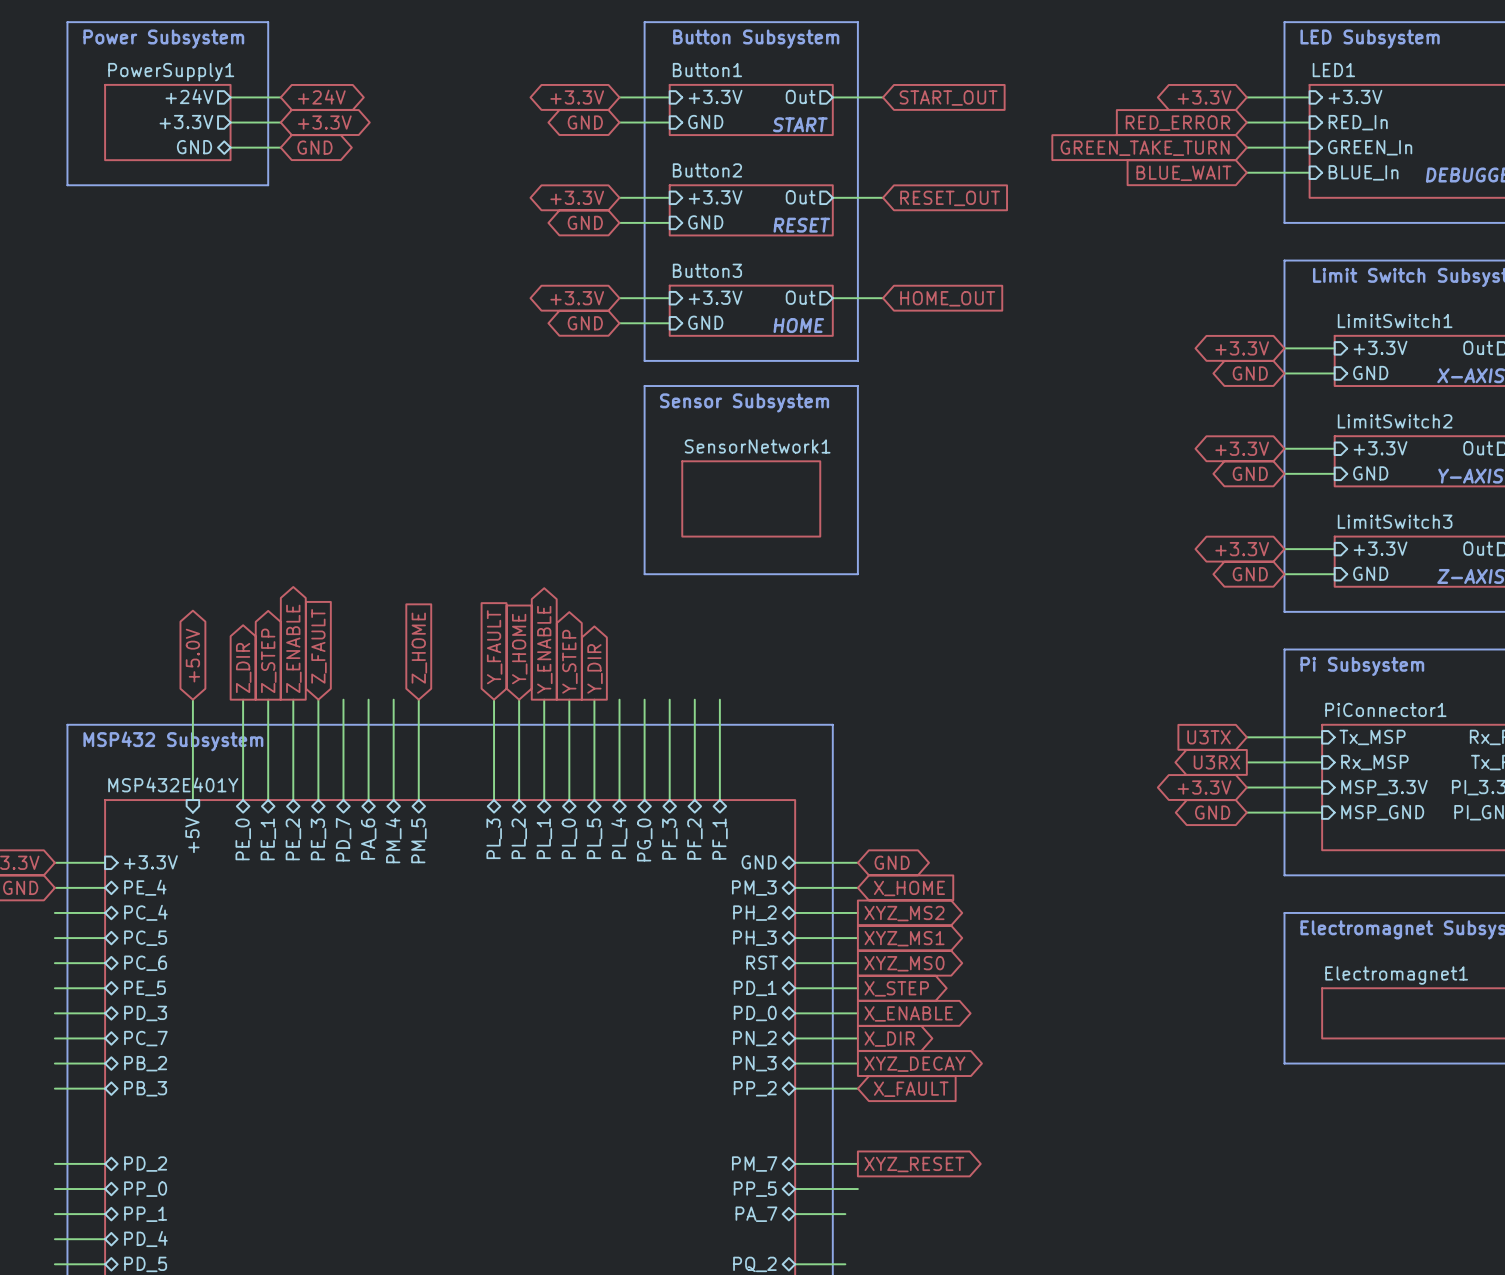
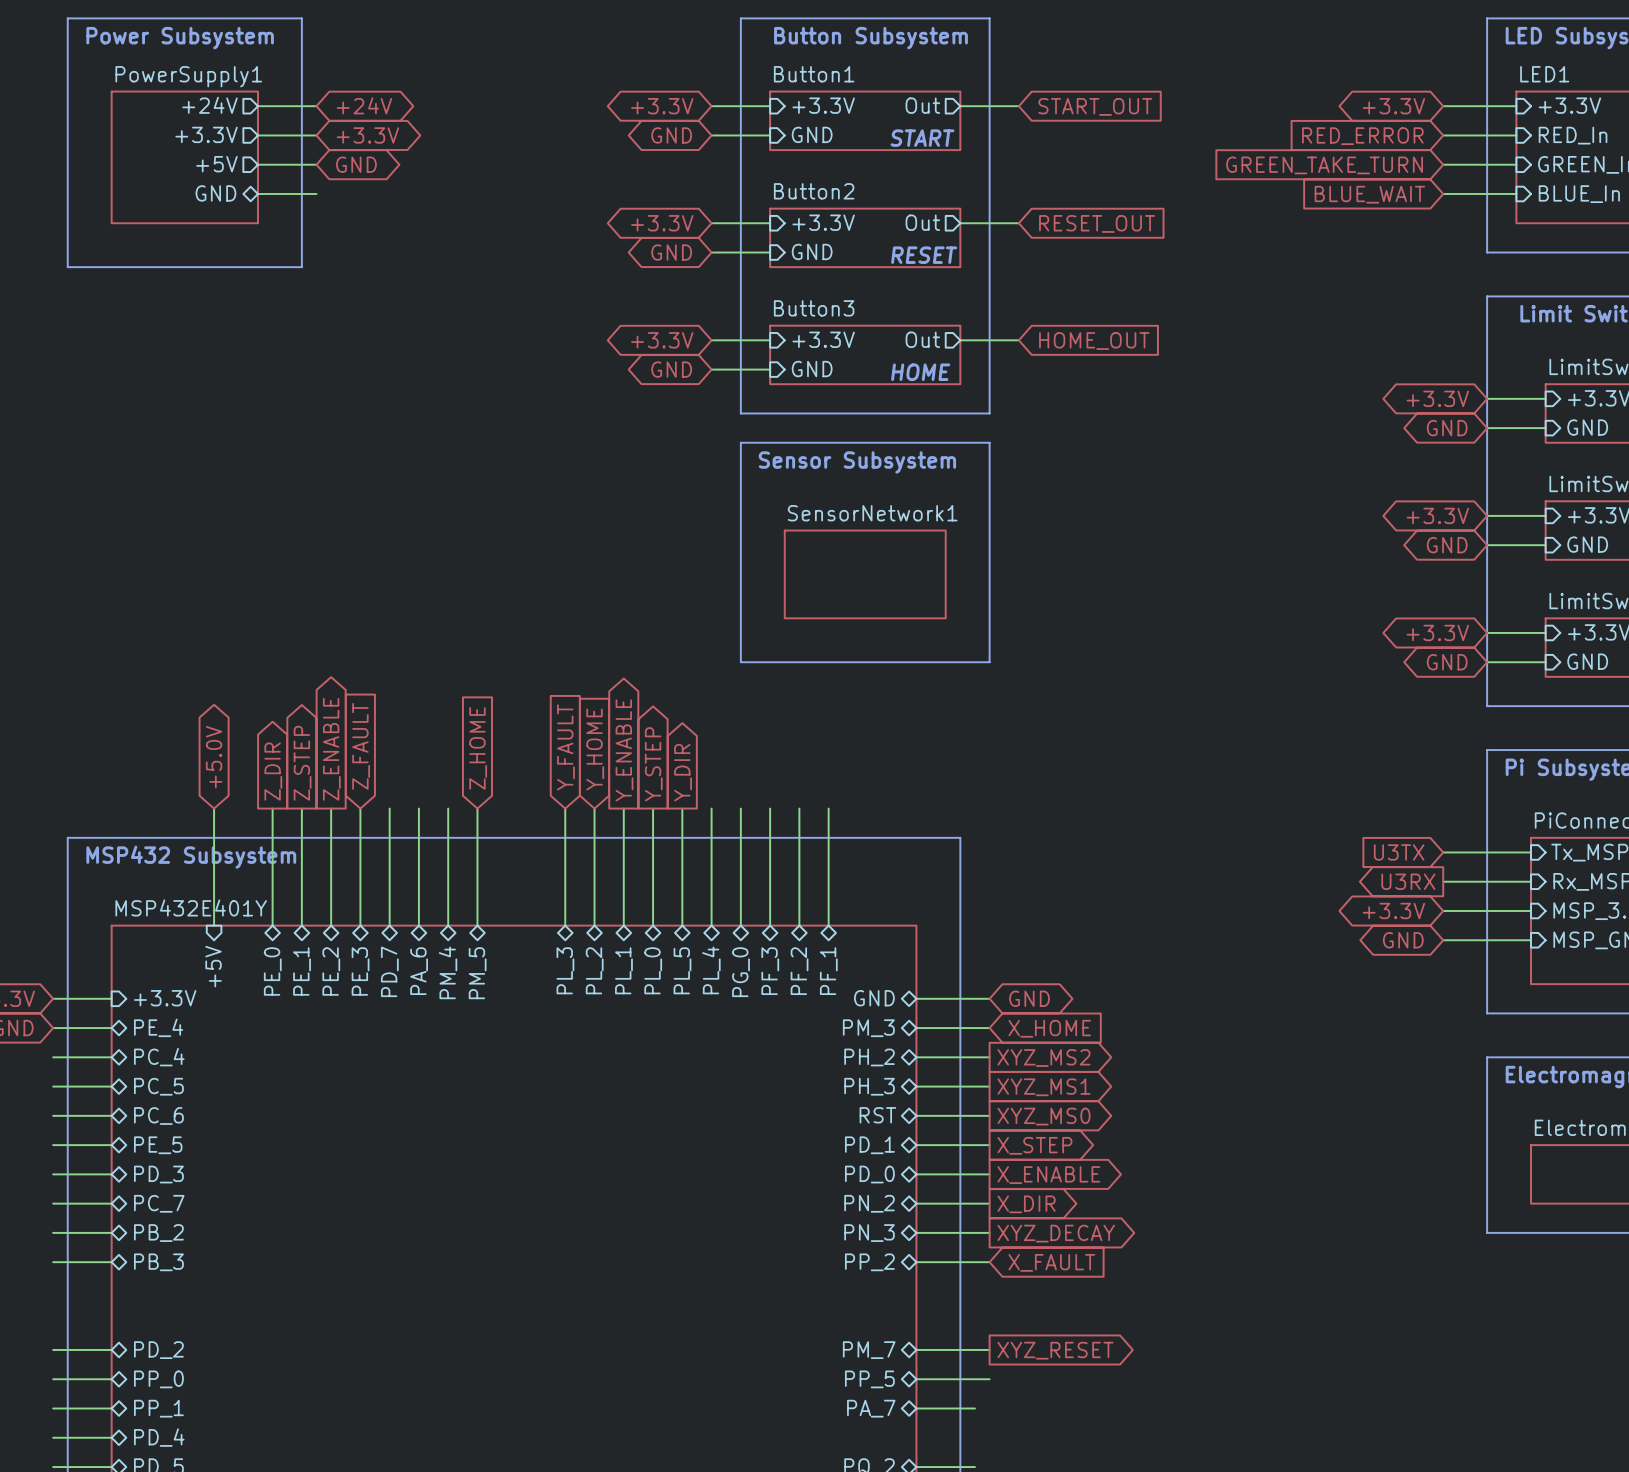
sheet PowerSupply1 shape: [104, 84, 232, 161] -> [110, 90, 259, 225]
sheet pin shape: bidirectional (194, 147) -> output (216, 164)
sheet pin: GND (194, 147) -> +5V (216, 164)
sheet pin: none -> GND (215, 193)
wire: none -> (257, 193) (316, 193)
line: (67, 185) (268, 185) -> (67, 208) (67, 267) (301, 267) (301, 208)

